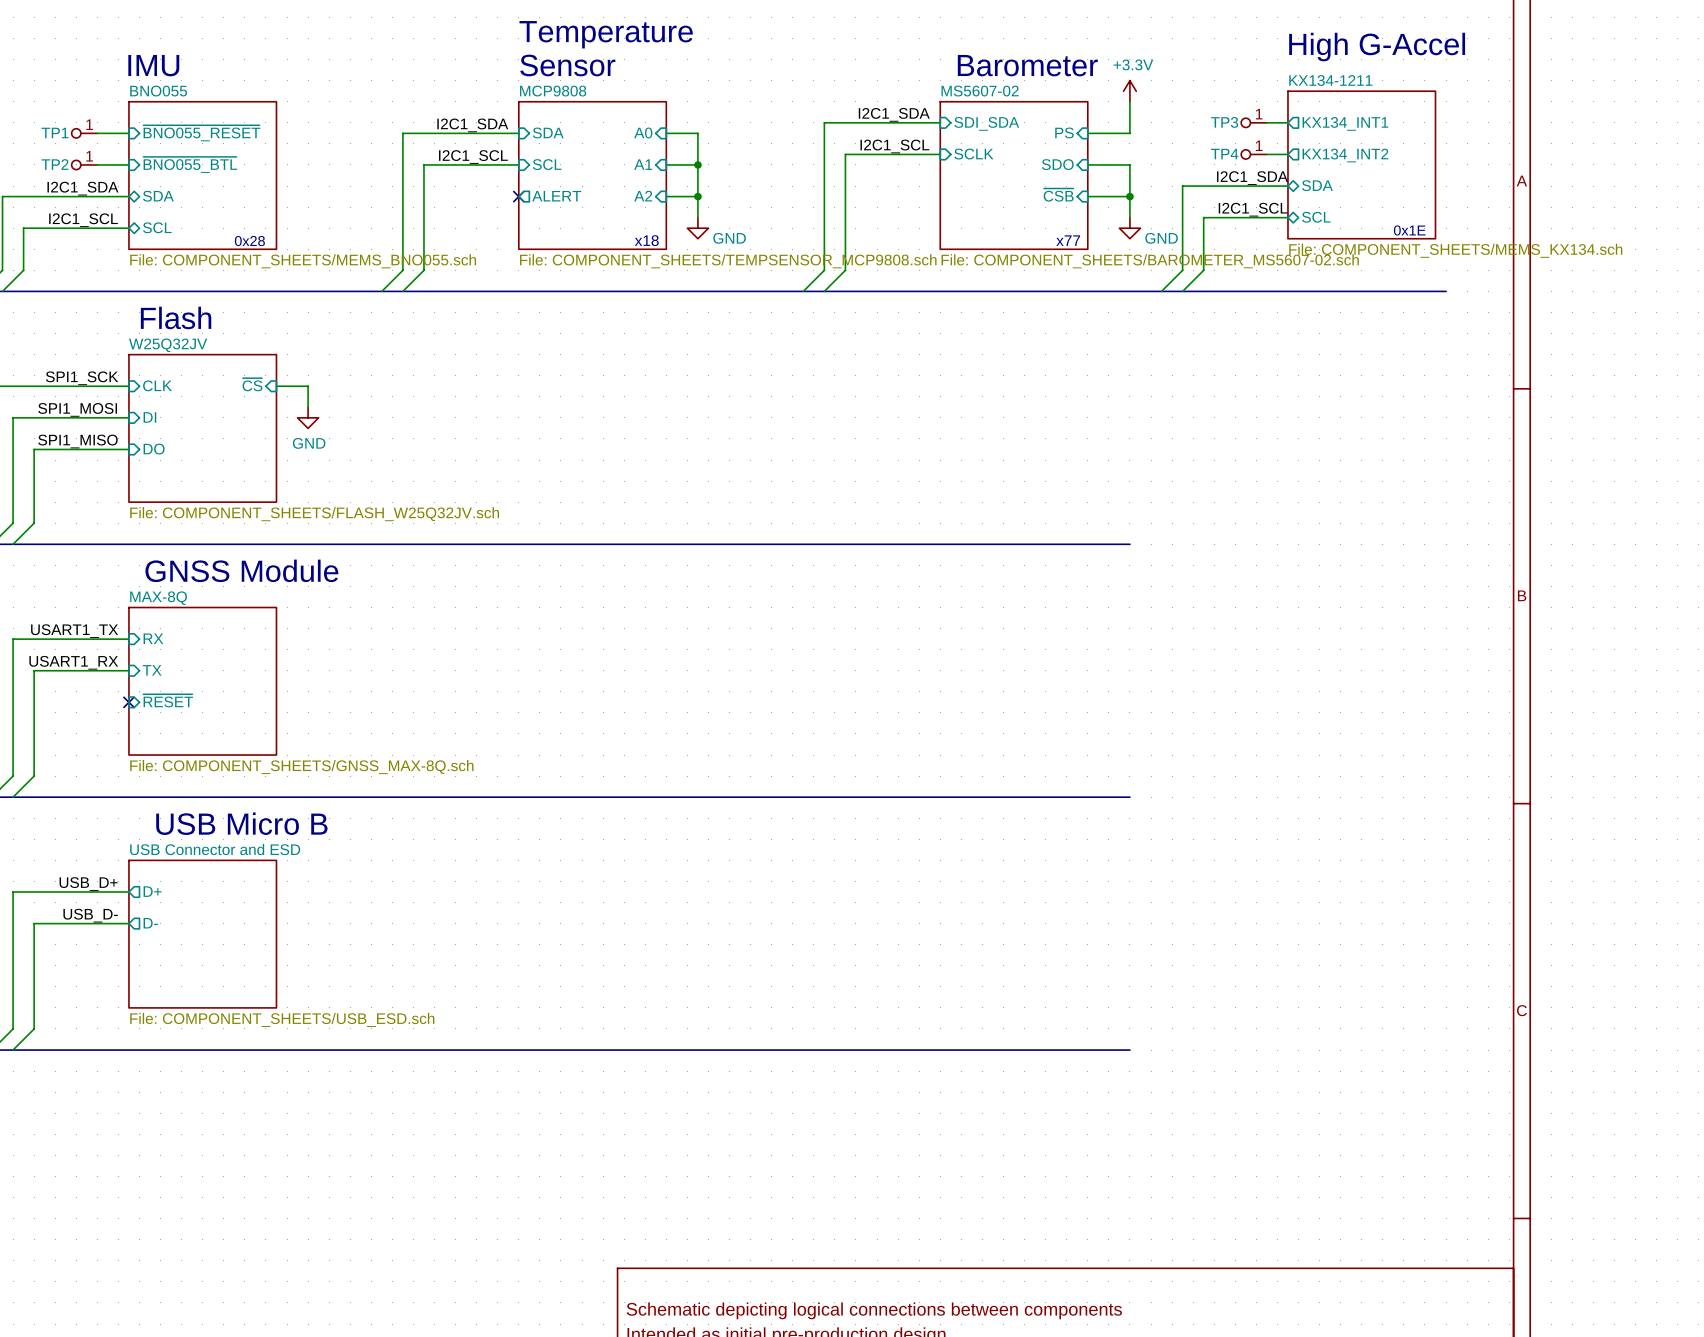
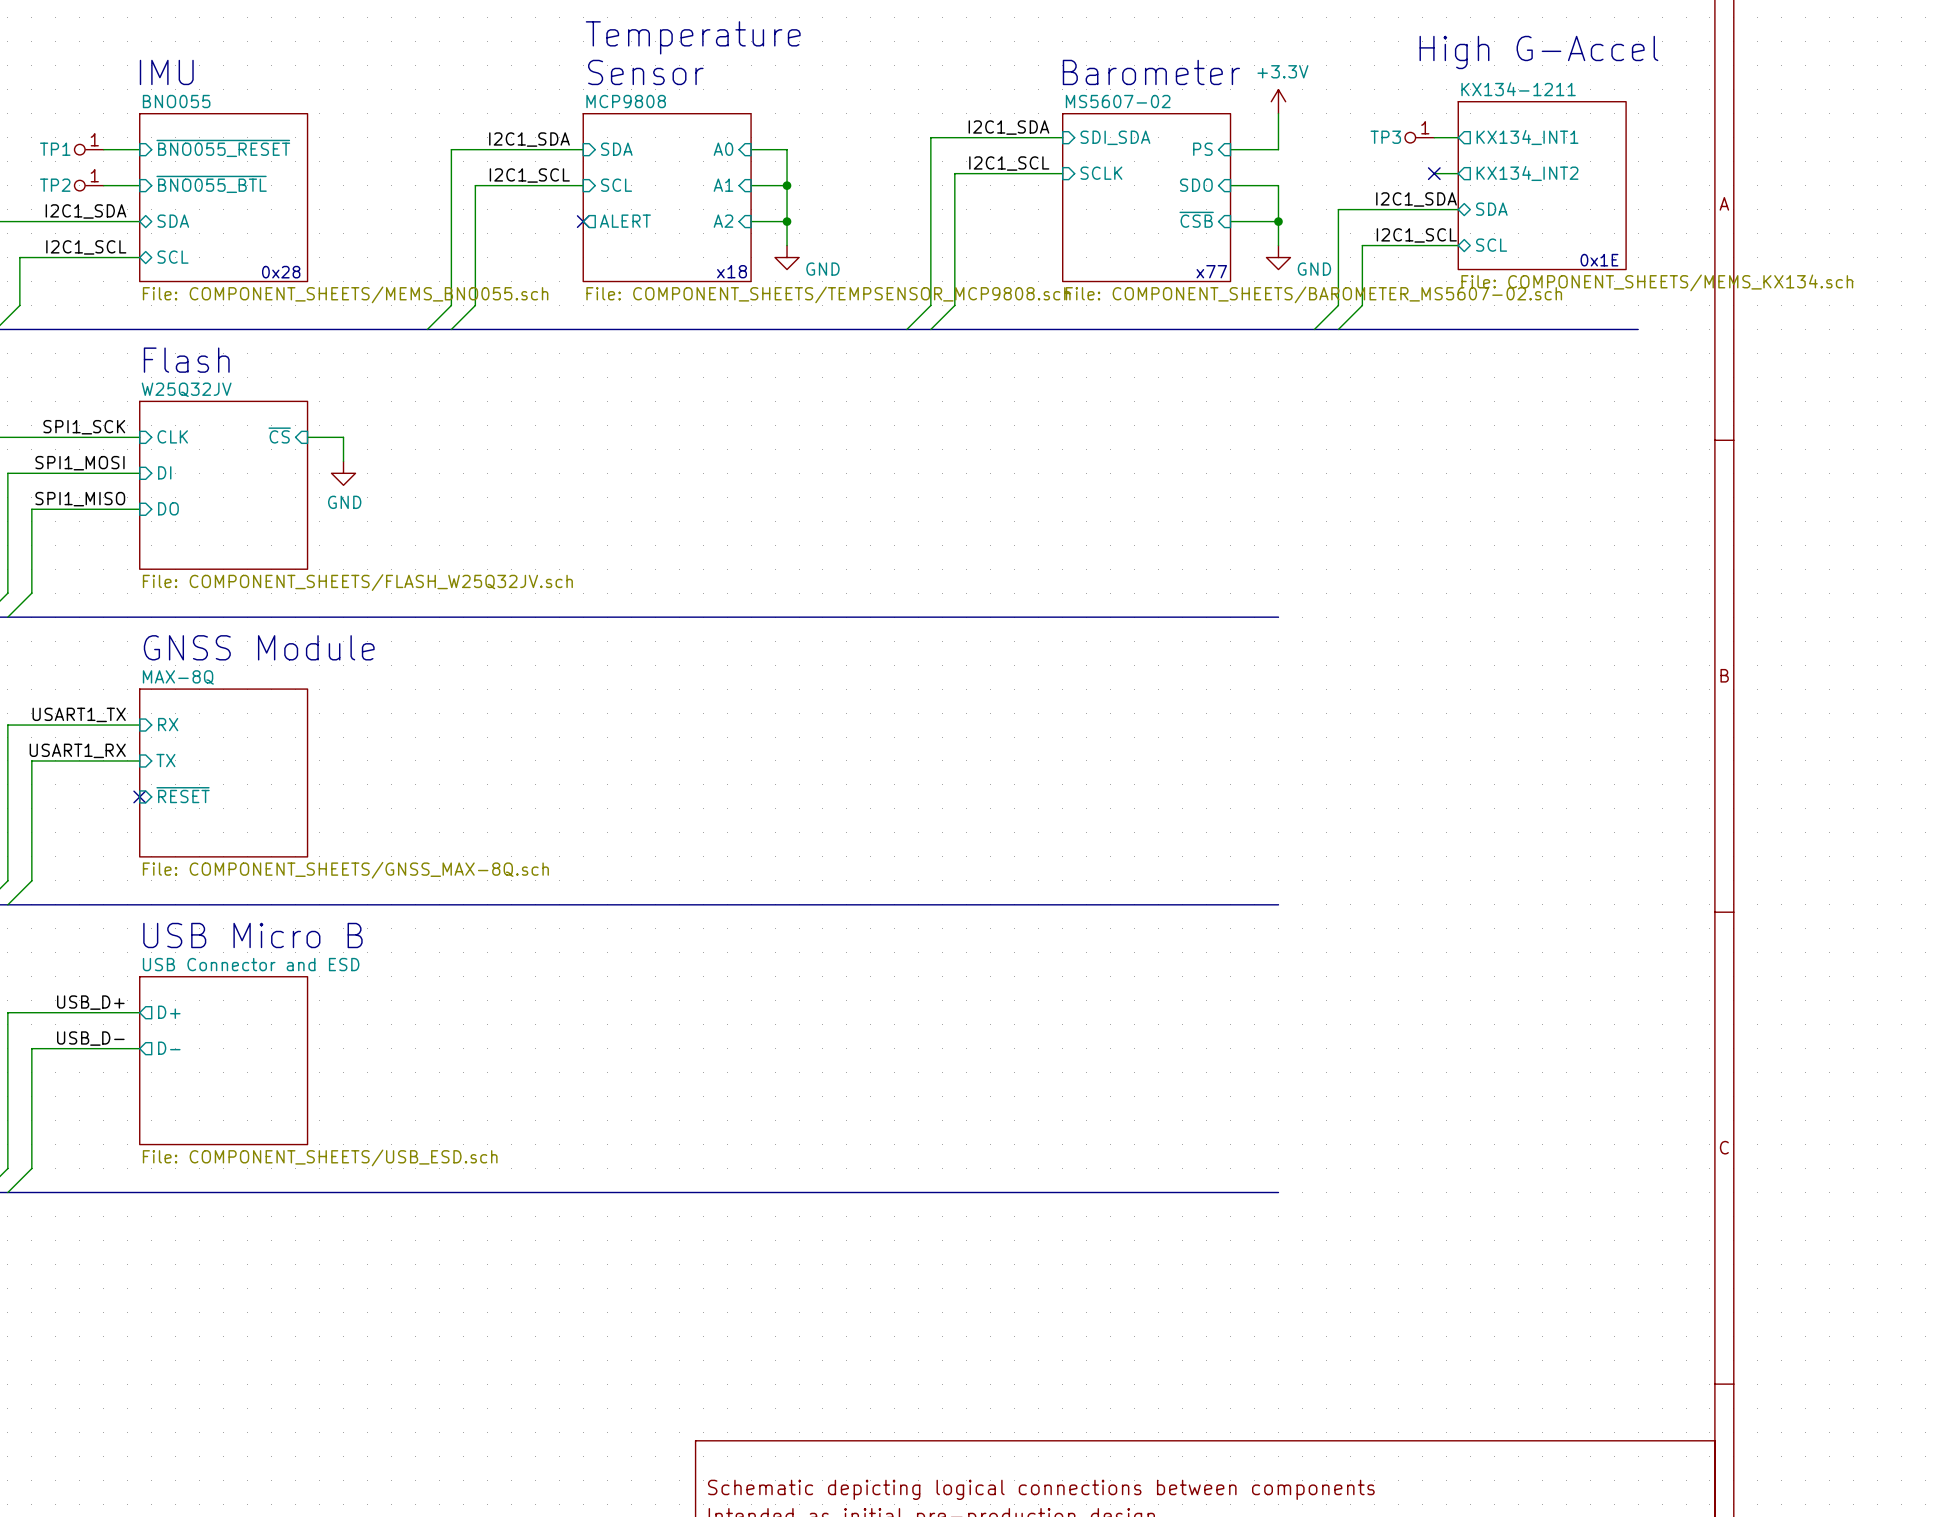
TP4: (1254, 154) -> none
no-connect mark: none -> (1434, 173)

